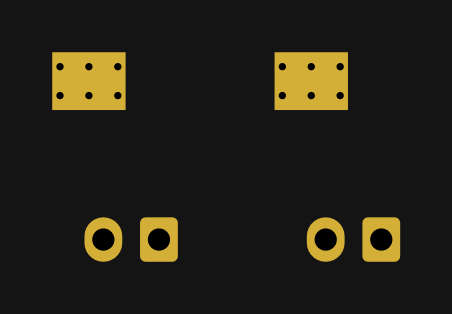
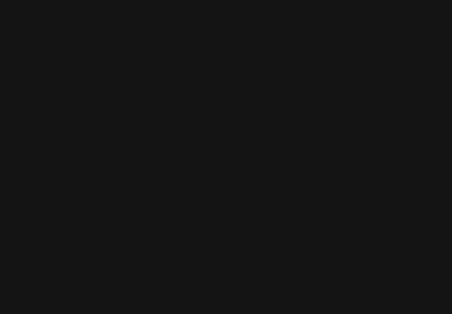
part: (88, 81) -> none
part: (311, 81) -> none
part: (131, 239) -> none
part: (353, 239) -> none

